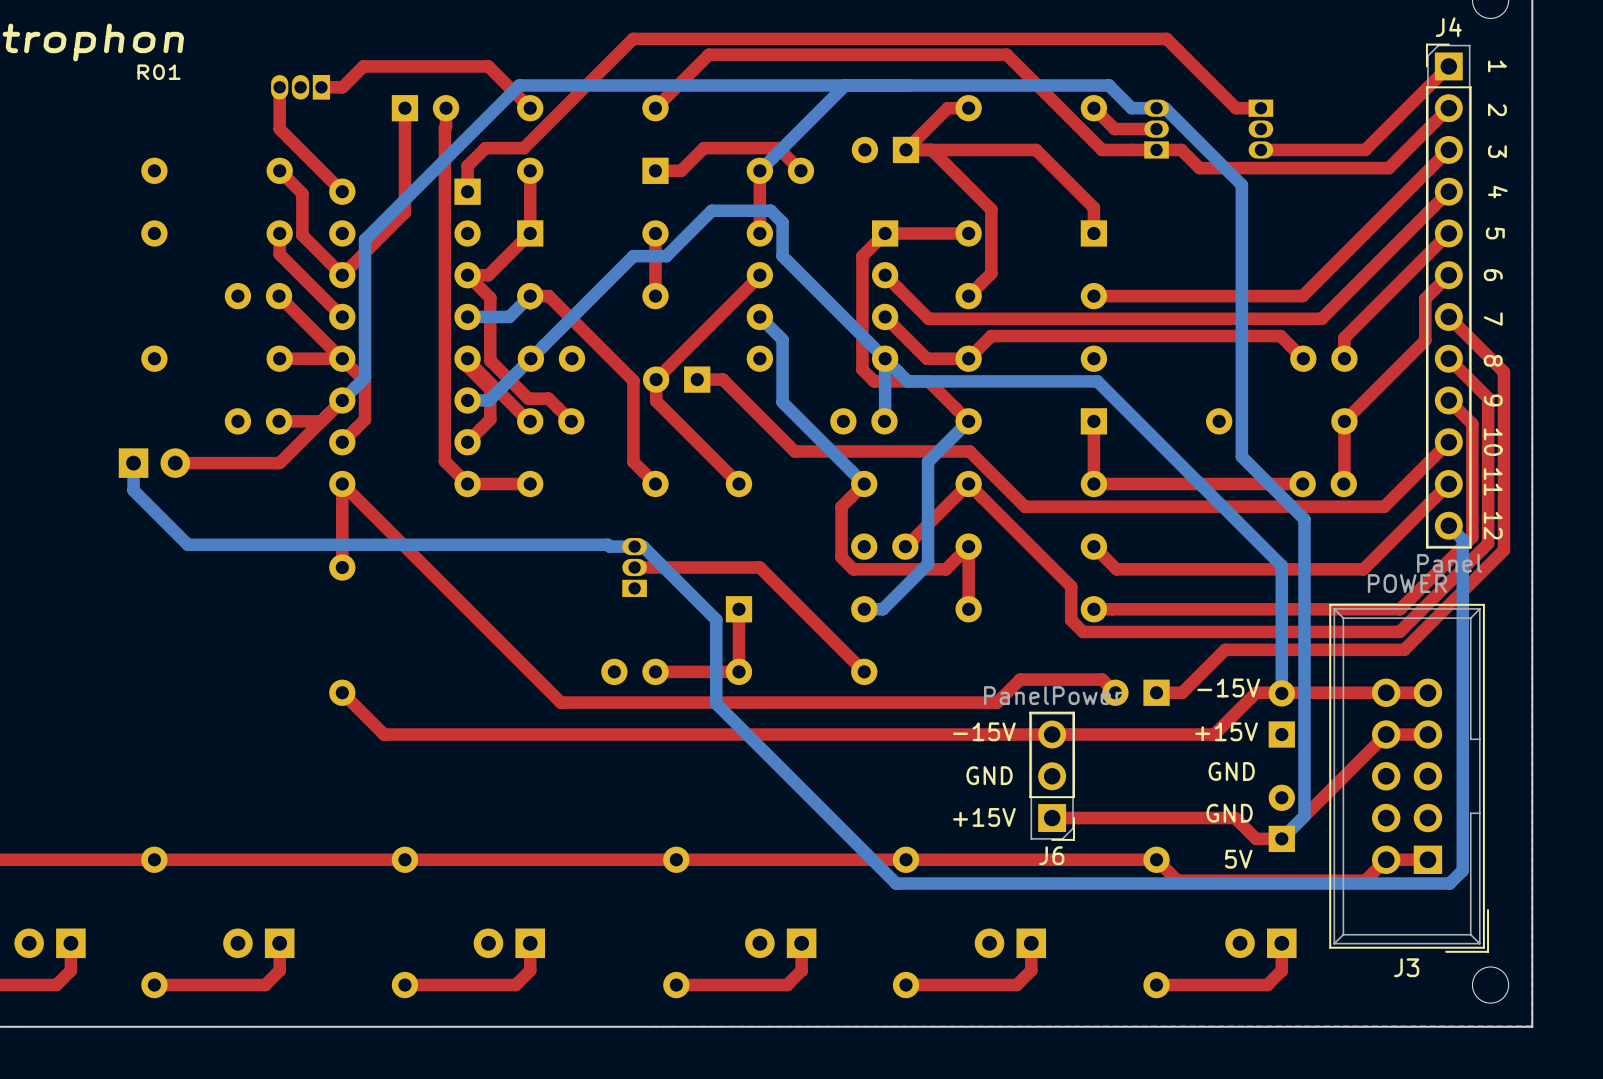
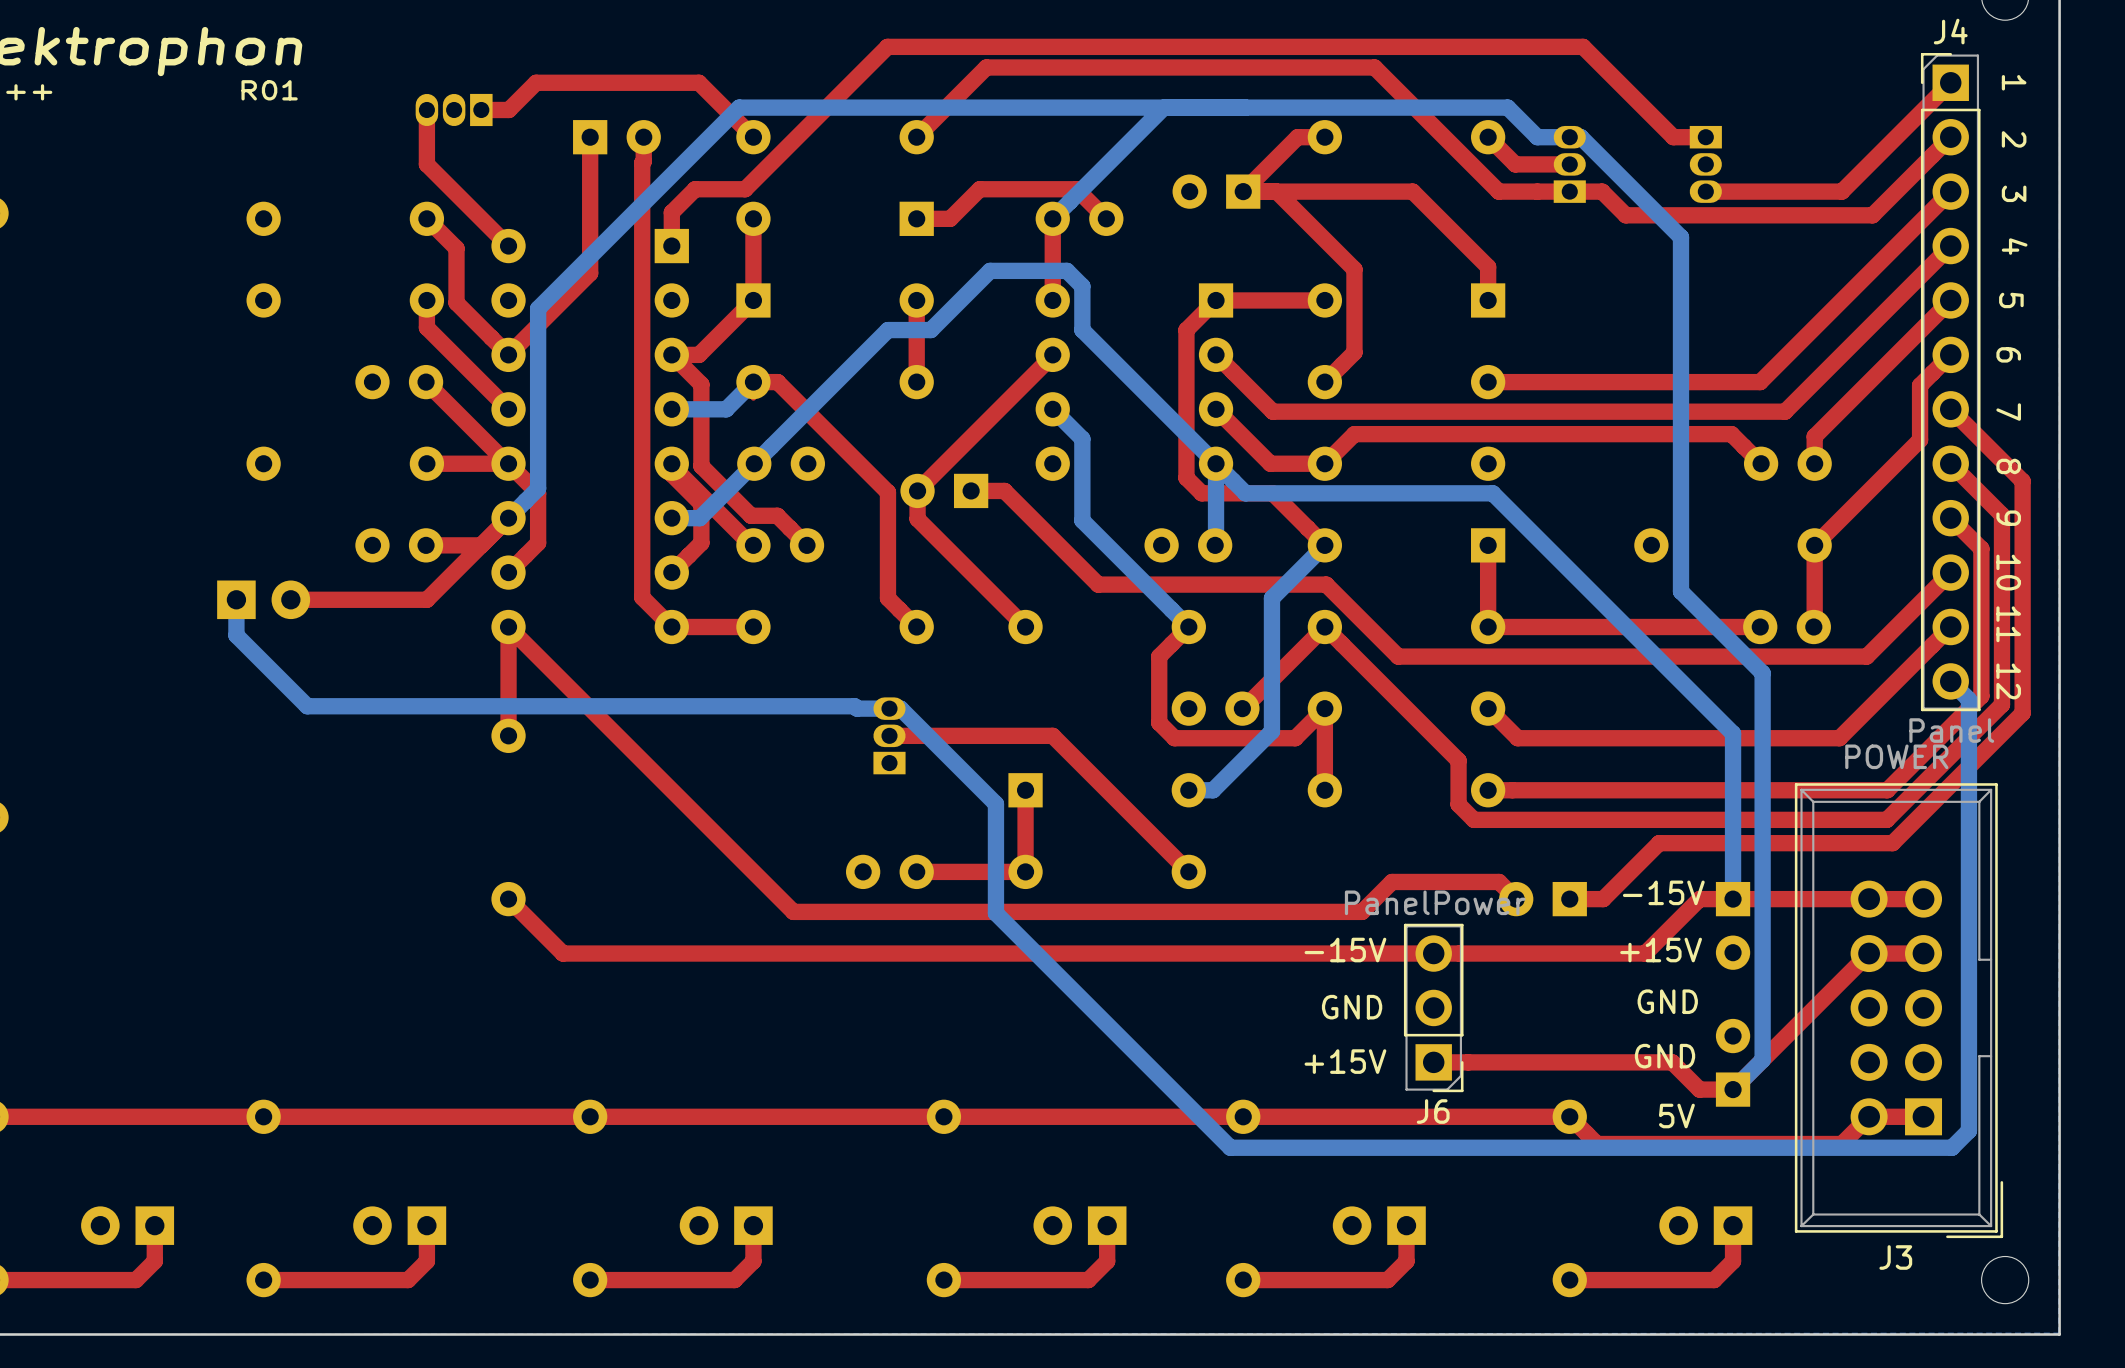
part rotation: 0° (1281, 713) -> 180° (1733, 925)

